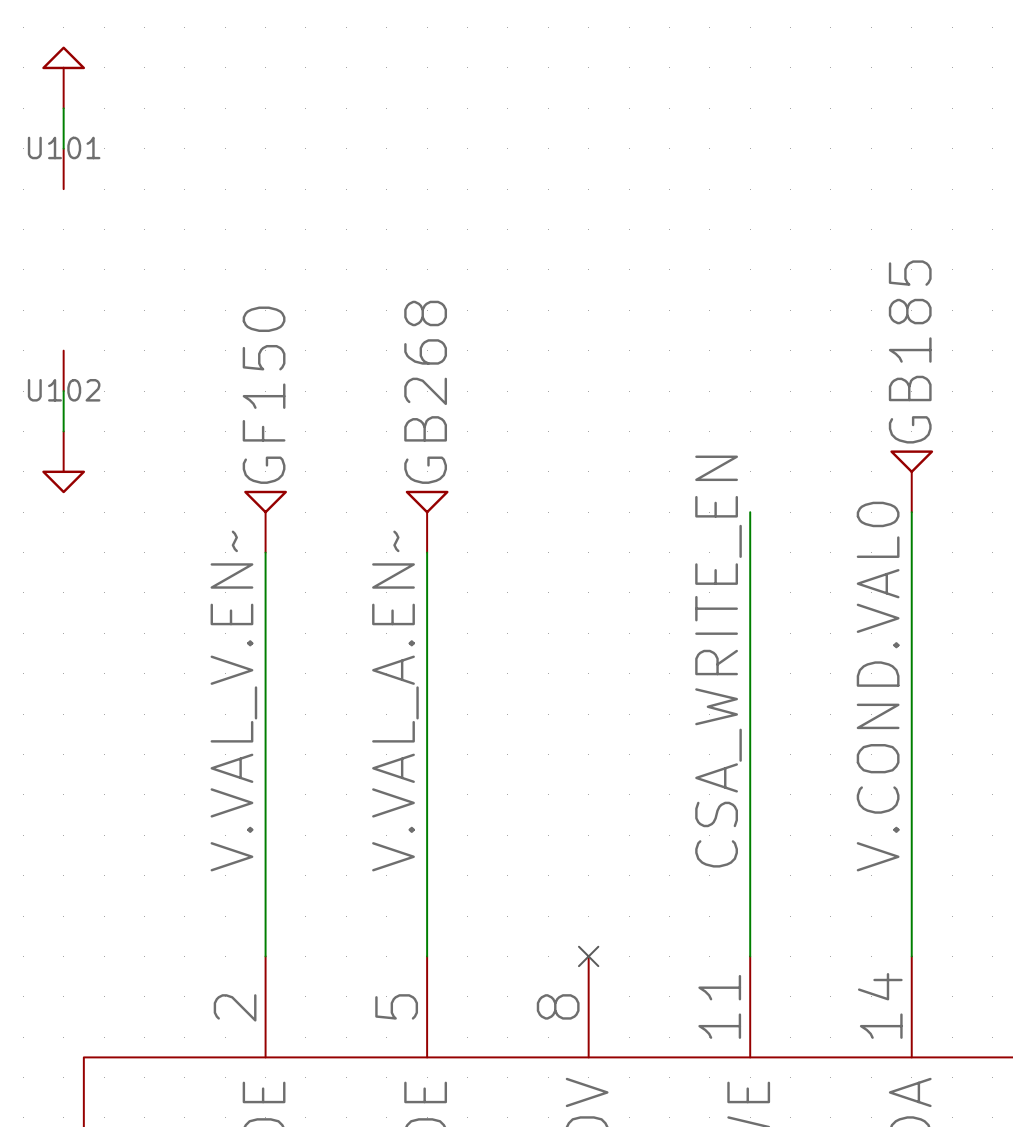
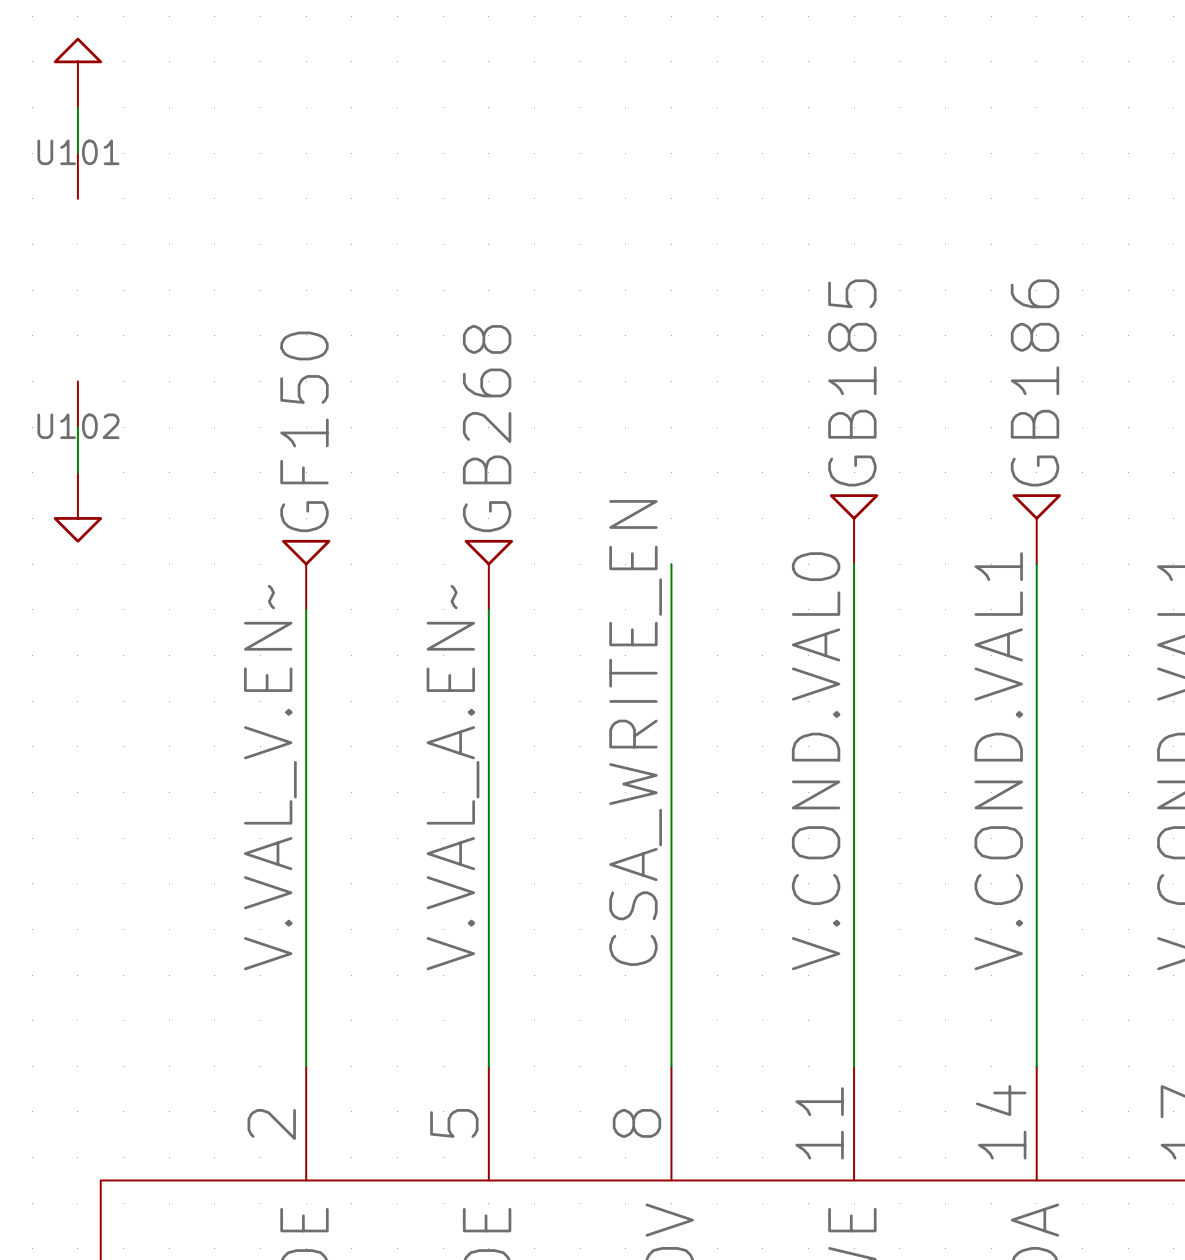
GB185 name: GB185 (910, 351) -> GB186 (1035, 382)
GB185: none -> (854, 529)
wire: none -> (671, 564) (671, 1066)
label: none -> CSA_WRITE_EN (635, 732)
label: CSA_WRITE_EN (718, 661) -> V.COND.VAL0 (816, 761)
label: V.COND.VAL0 (878, 686) -> V.COND.VAL1 (998, 761)
no-connect mark: (588, 956) -> none

